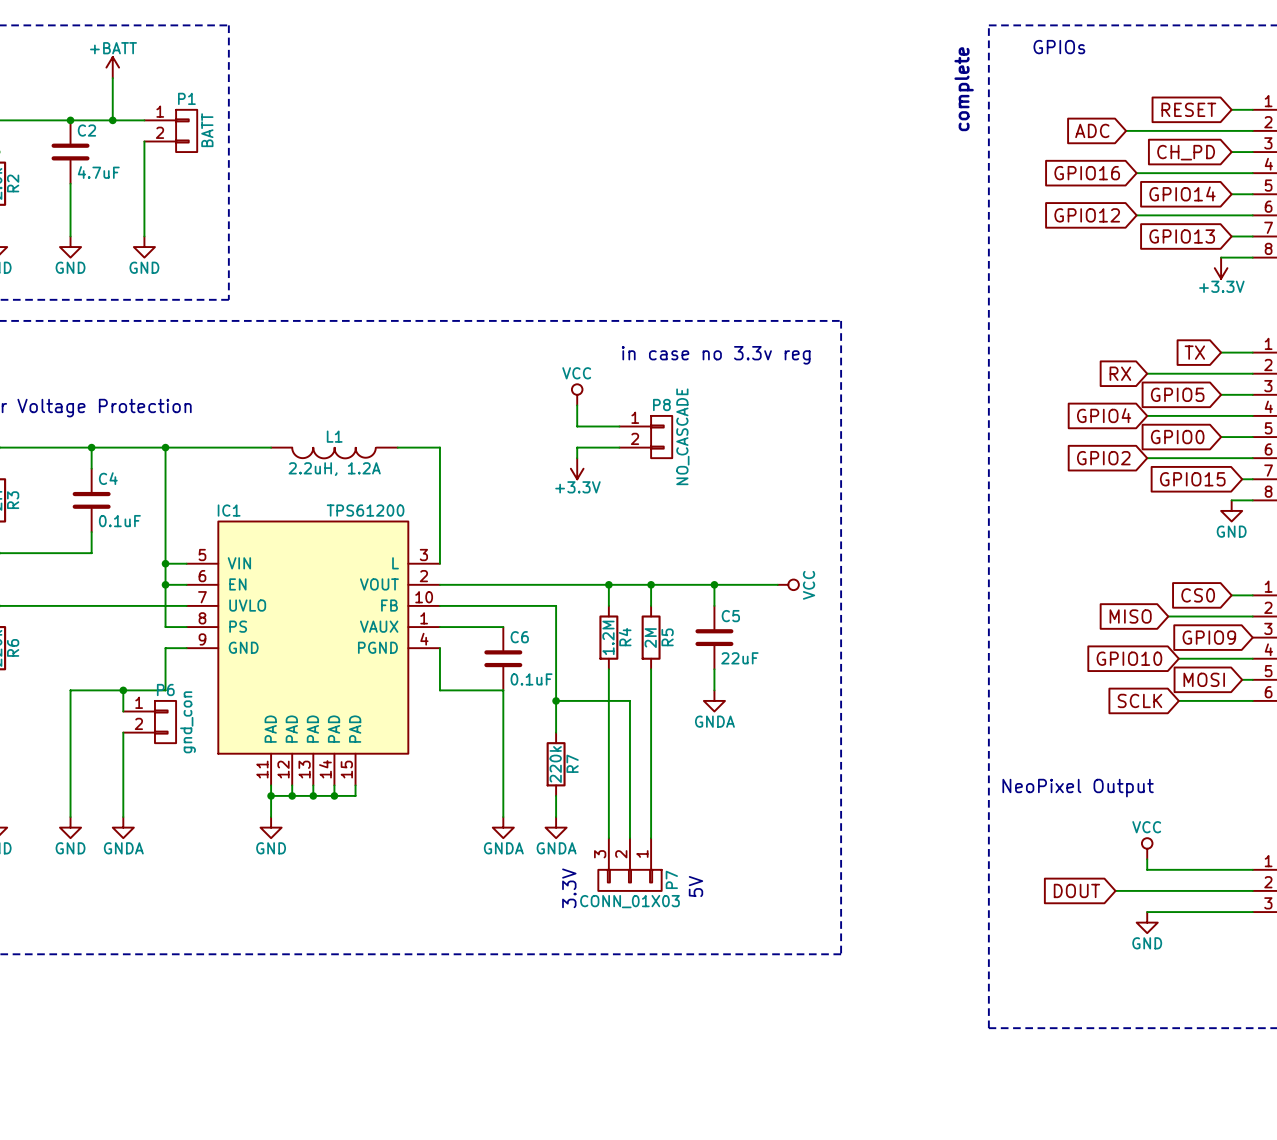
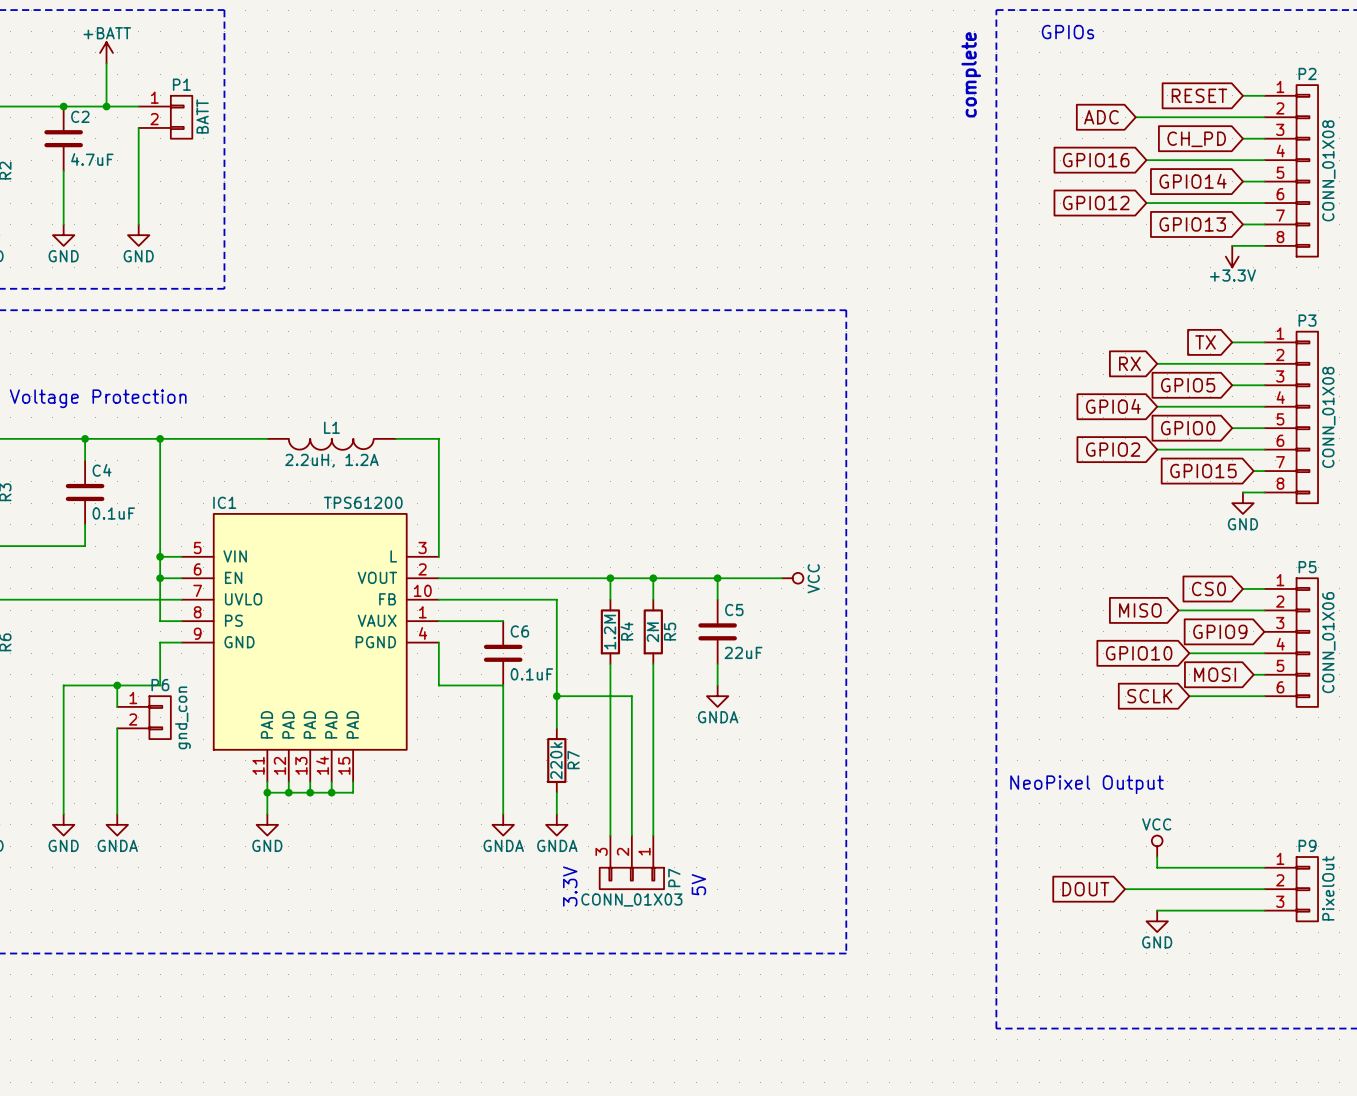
text: in case no 3.3v reg (716, 355) -> none
power symbol: VCC (577, 394) -> none
wire: (577, 405) (577, 426) (619, 426) -> none
P8: NO_CASCADE (645, 437) -> none
wire: (619, 447) (577, 447) (577, 458) -> none
power symbol: +3.3V (577, 468) -> none

